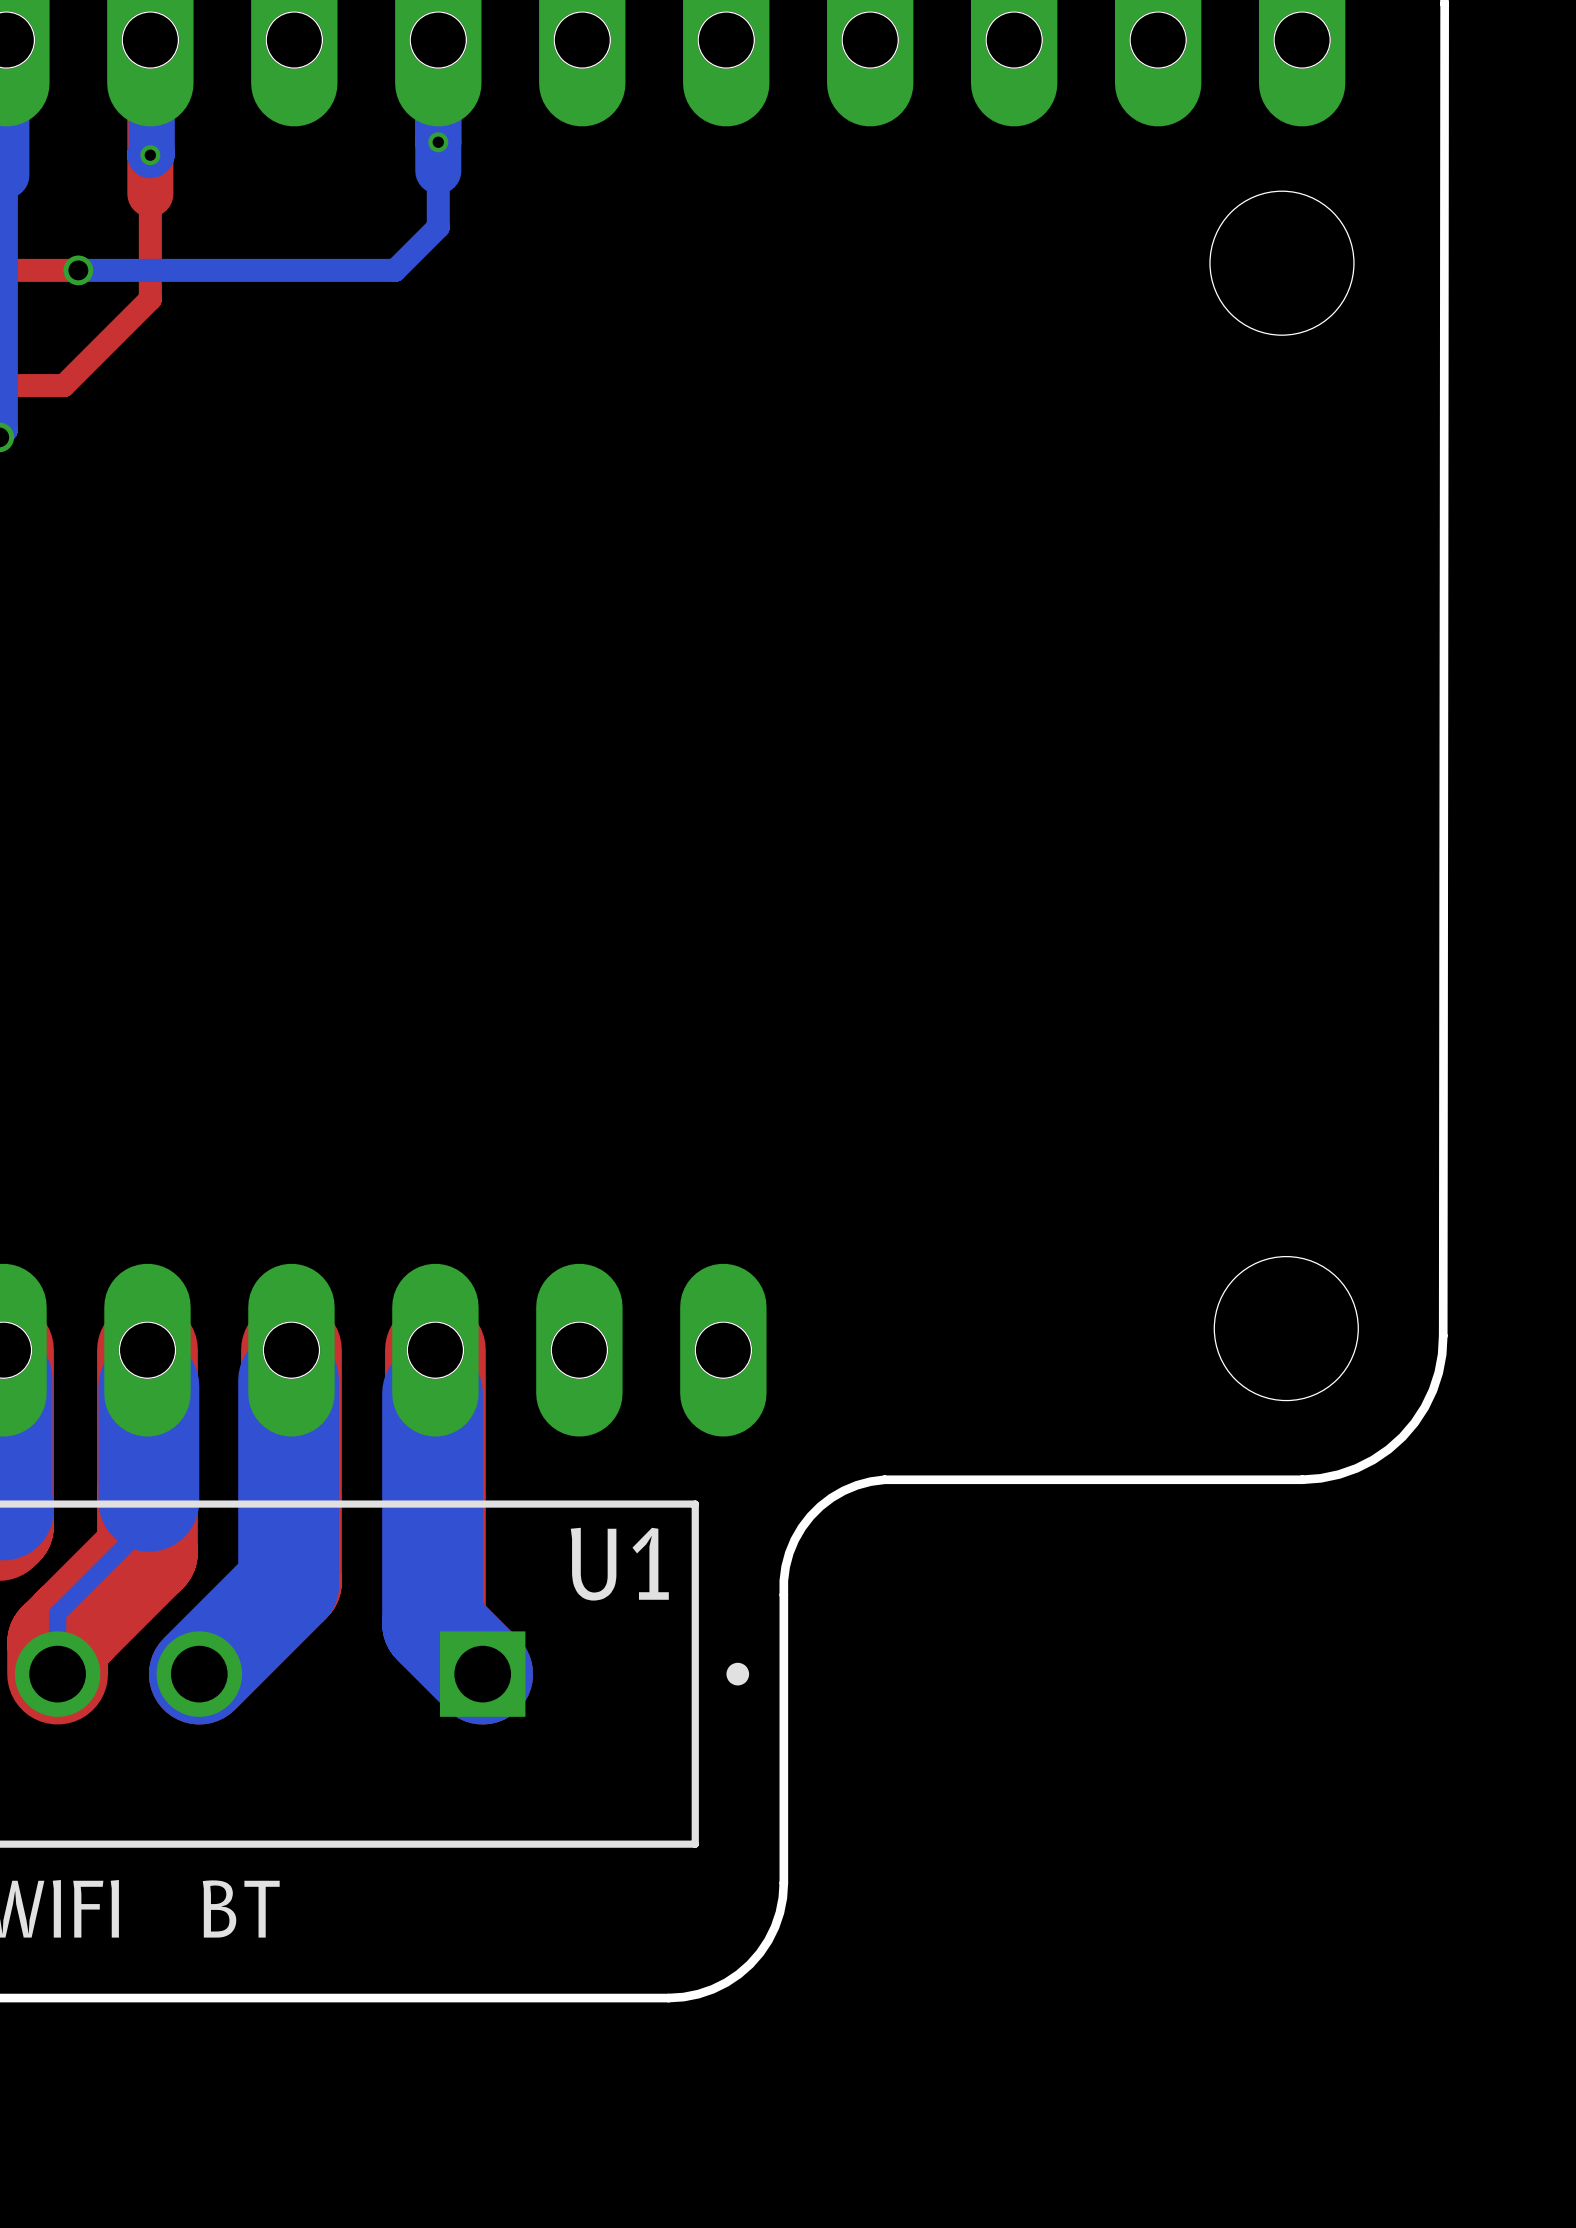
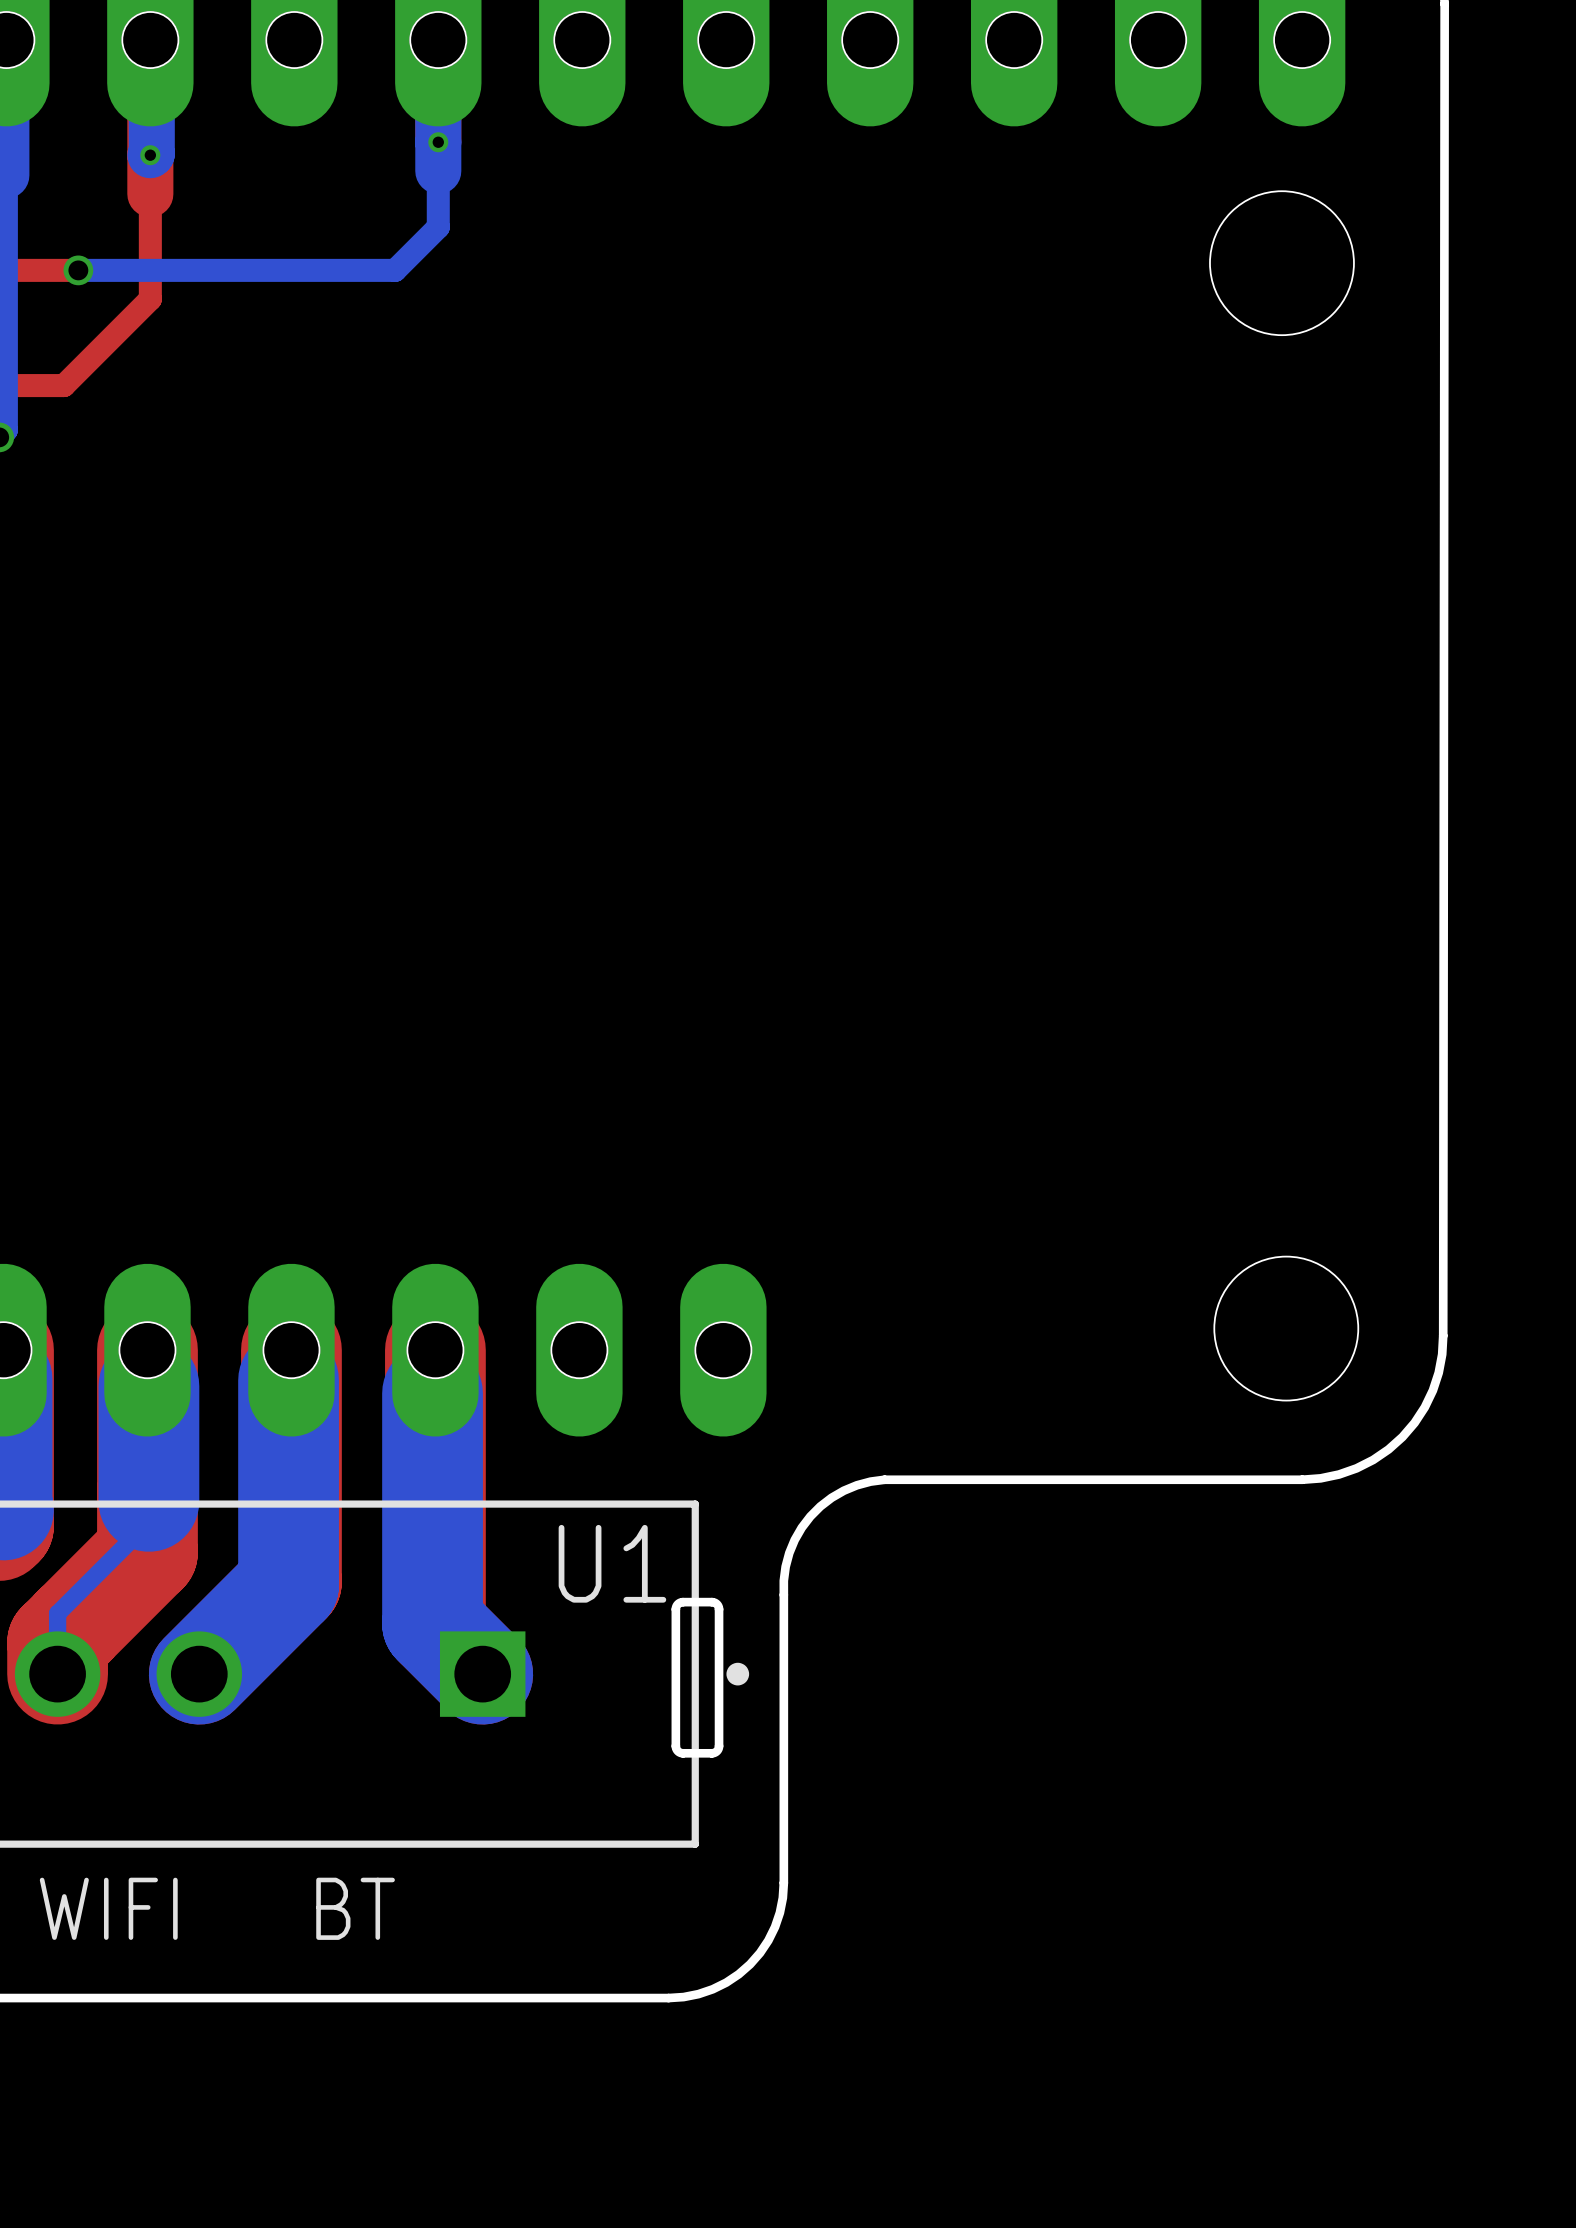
board edge: none -> (711, 1602) (682, 1602) (676, 1607) (675, 1746) (681, 1753) (712, 1753) (718, 1747) (719, 1609) (716, 1604) (711, 1602)

